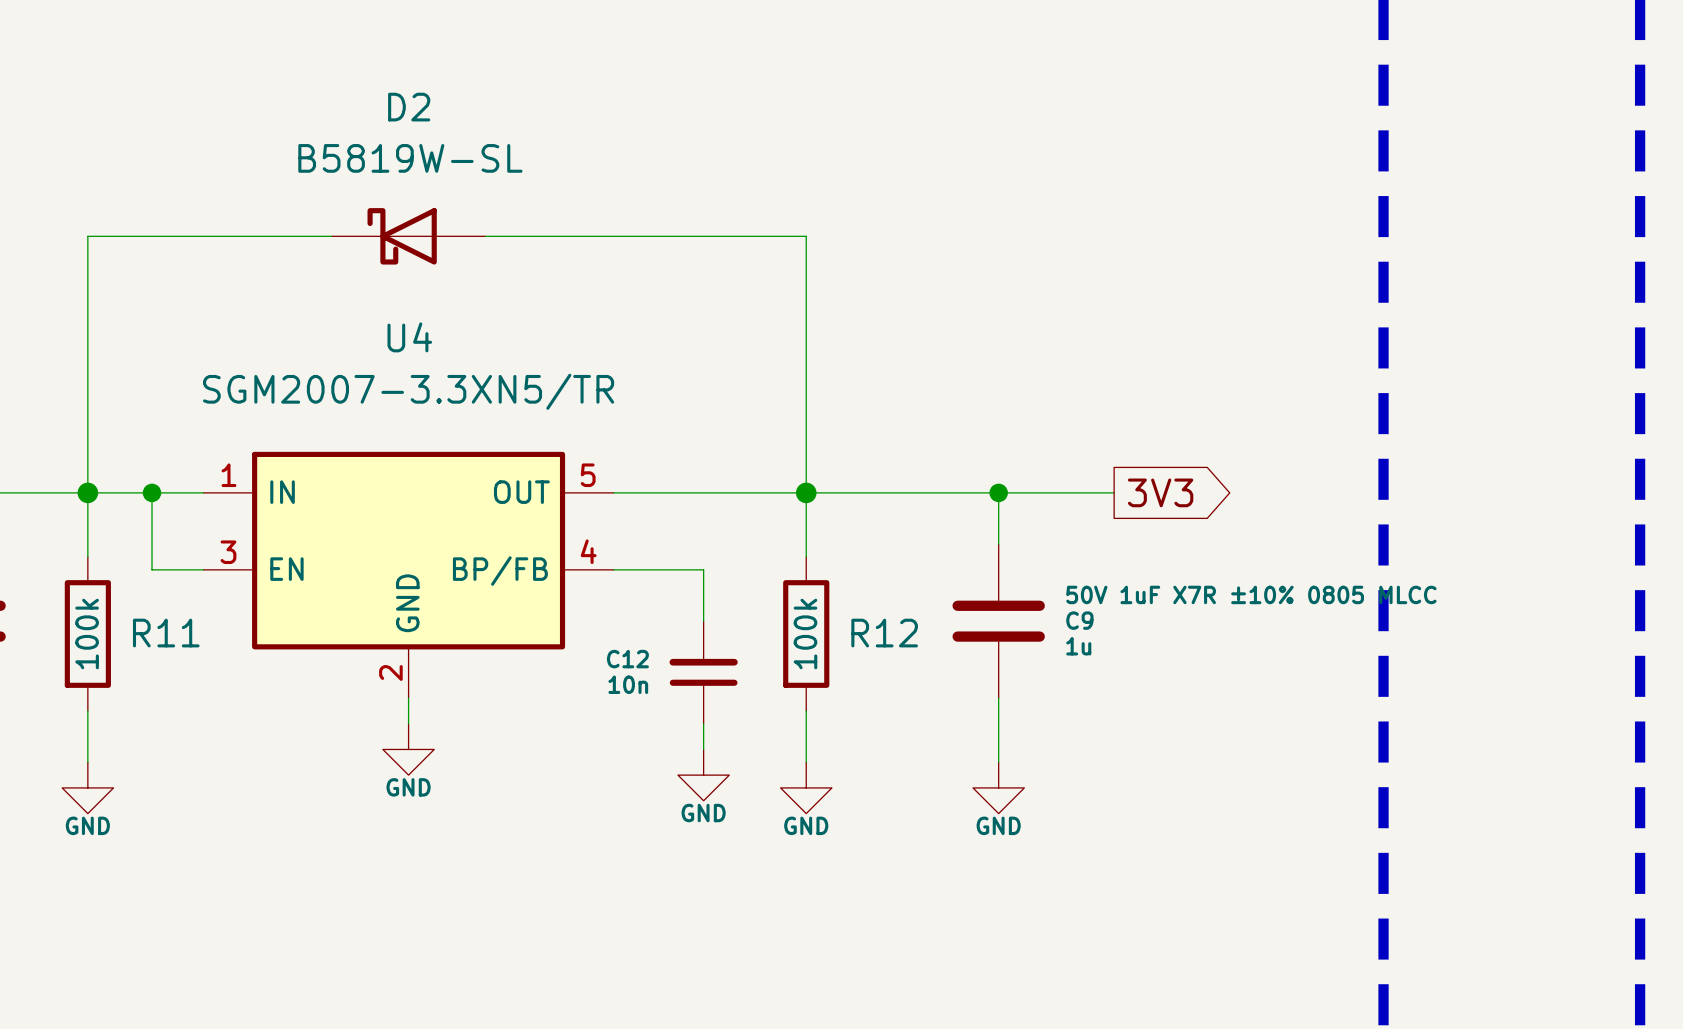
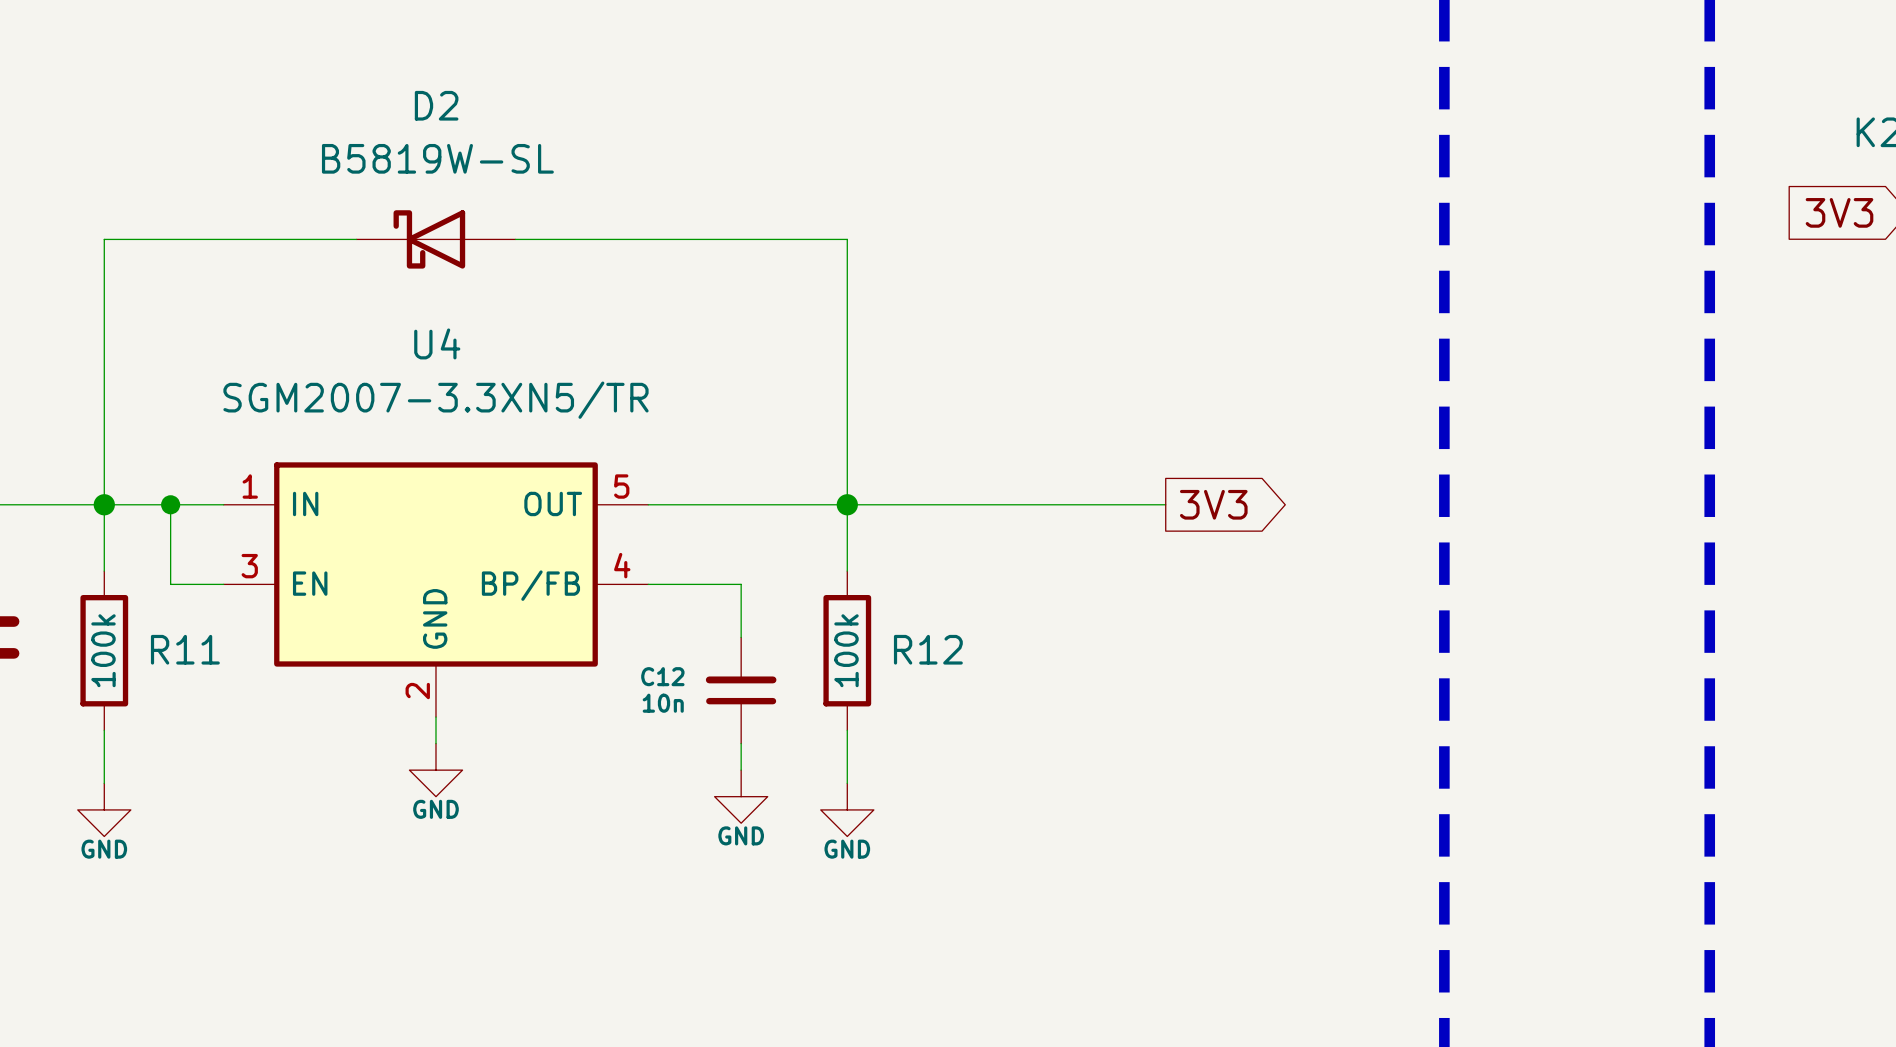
wire: (998, 492) (998, 544) -> none
junction: (998, 492) -> none
C9: 1u (998, 621) -> none
wire: (998, 698) (998, 762) -> none
power symbol: GND (998, 787) -> none

